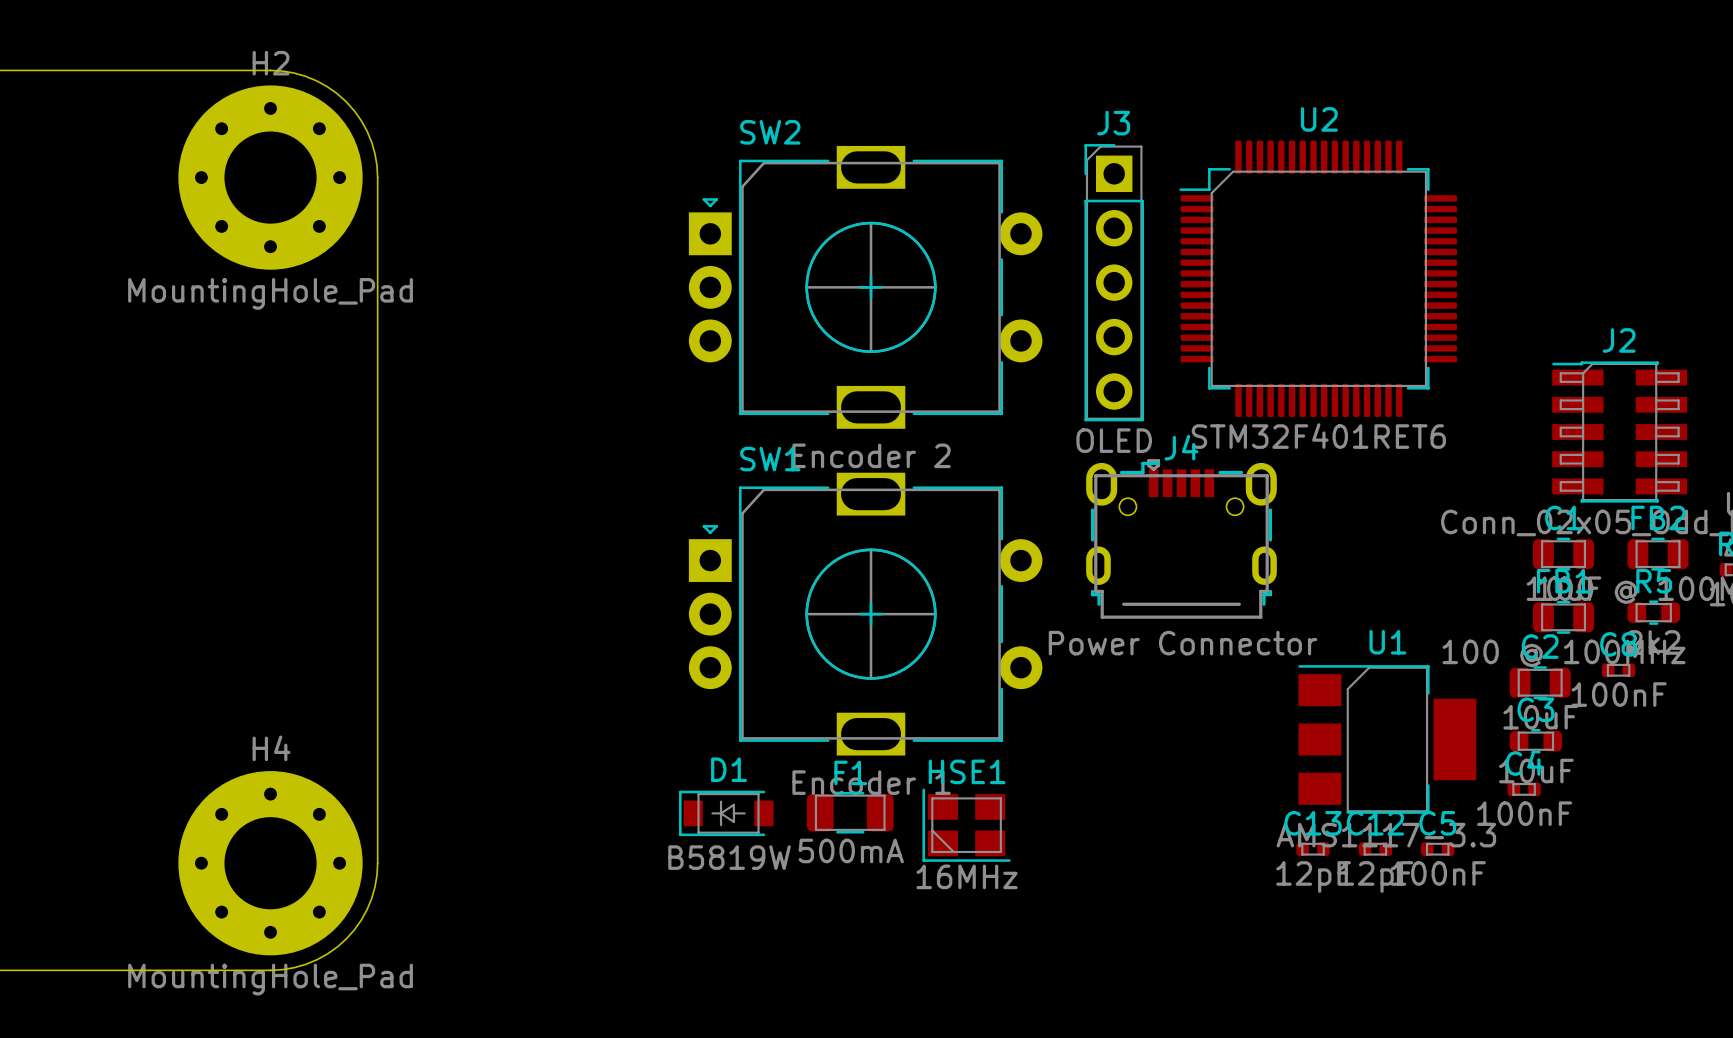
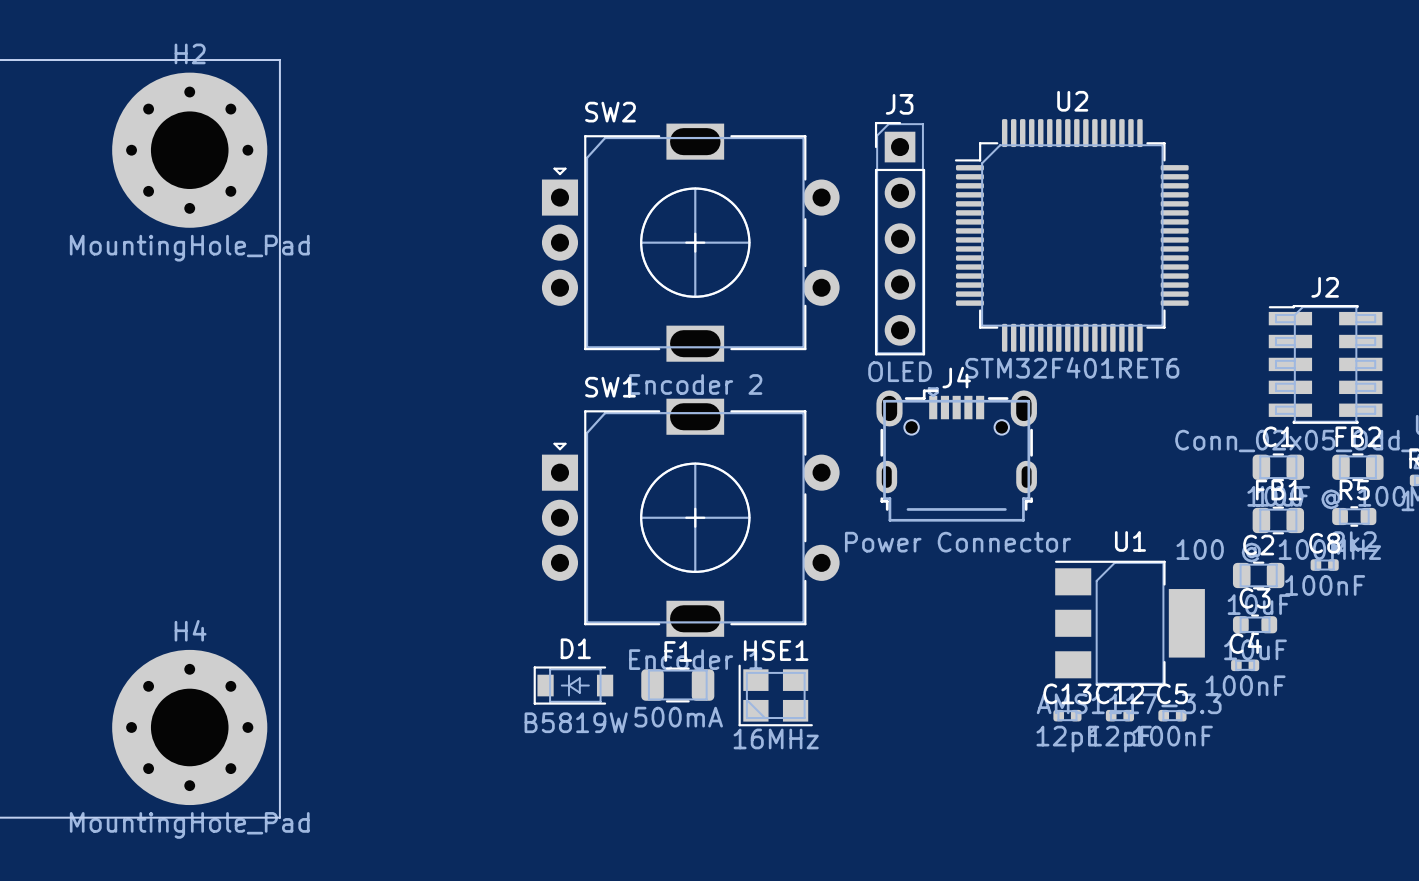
board edge: (270, 70) (294, 73) (317, 81) (346, 101) (361, 120) (371, 142) (377, 177) -> (189, 60) (279, 60) (279, 150)
board edge: (377, 863) (371, 898) (361, 920) (346, 938) (317, 959) (294, 967) (270, 970) -> (279, 727) (279, 817) (189, 817)

